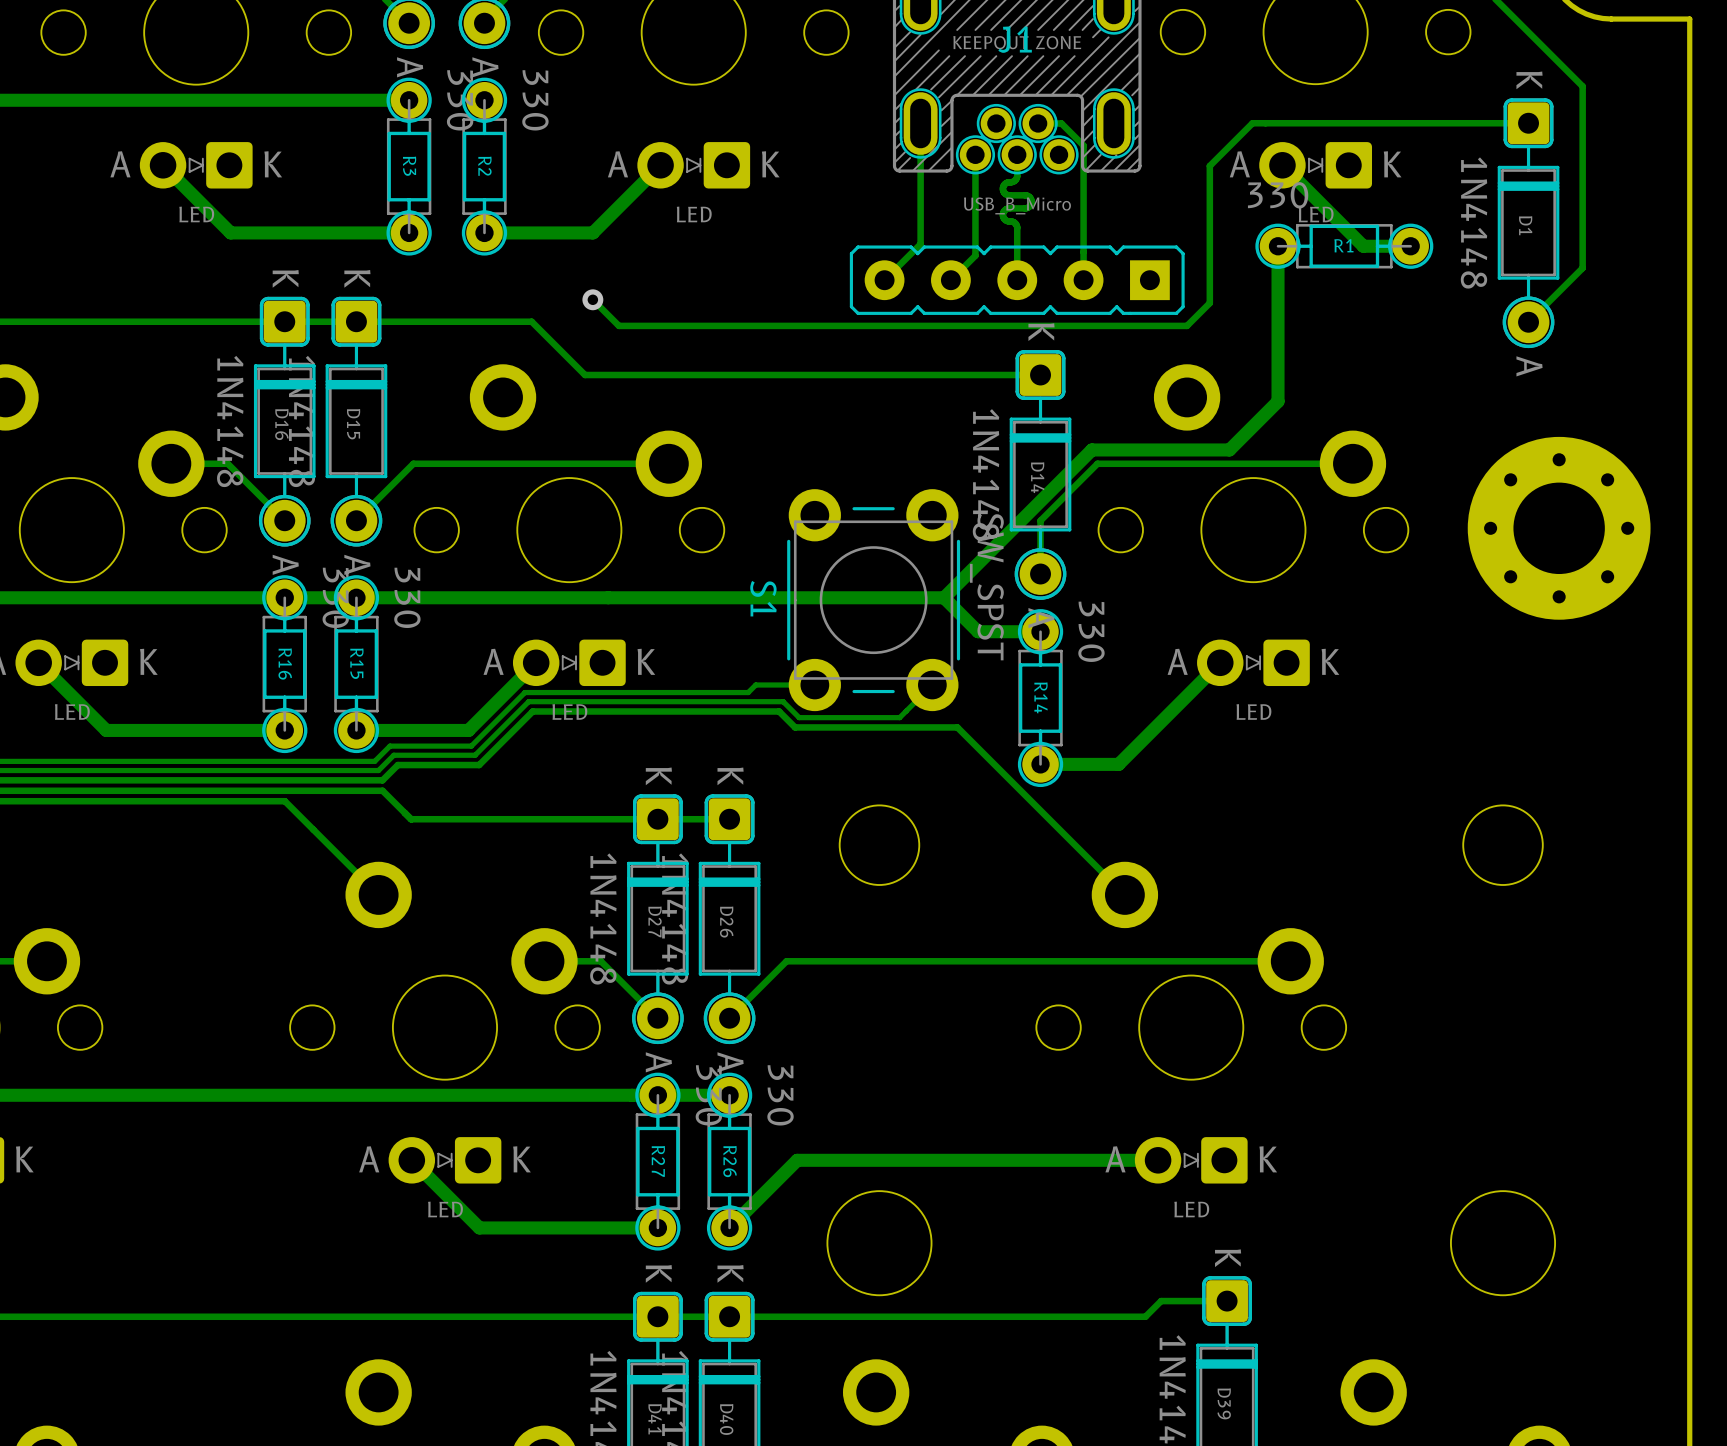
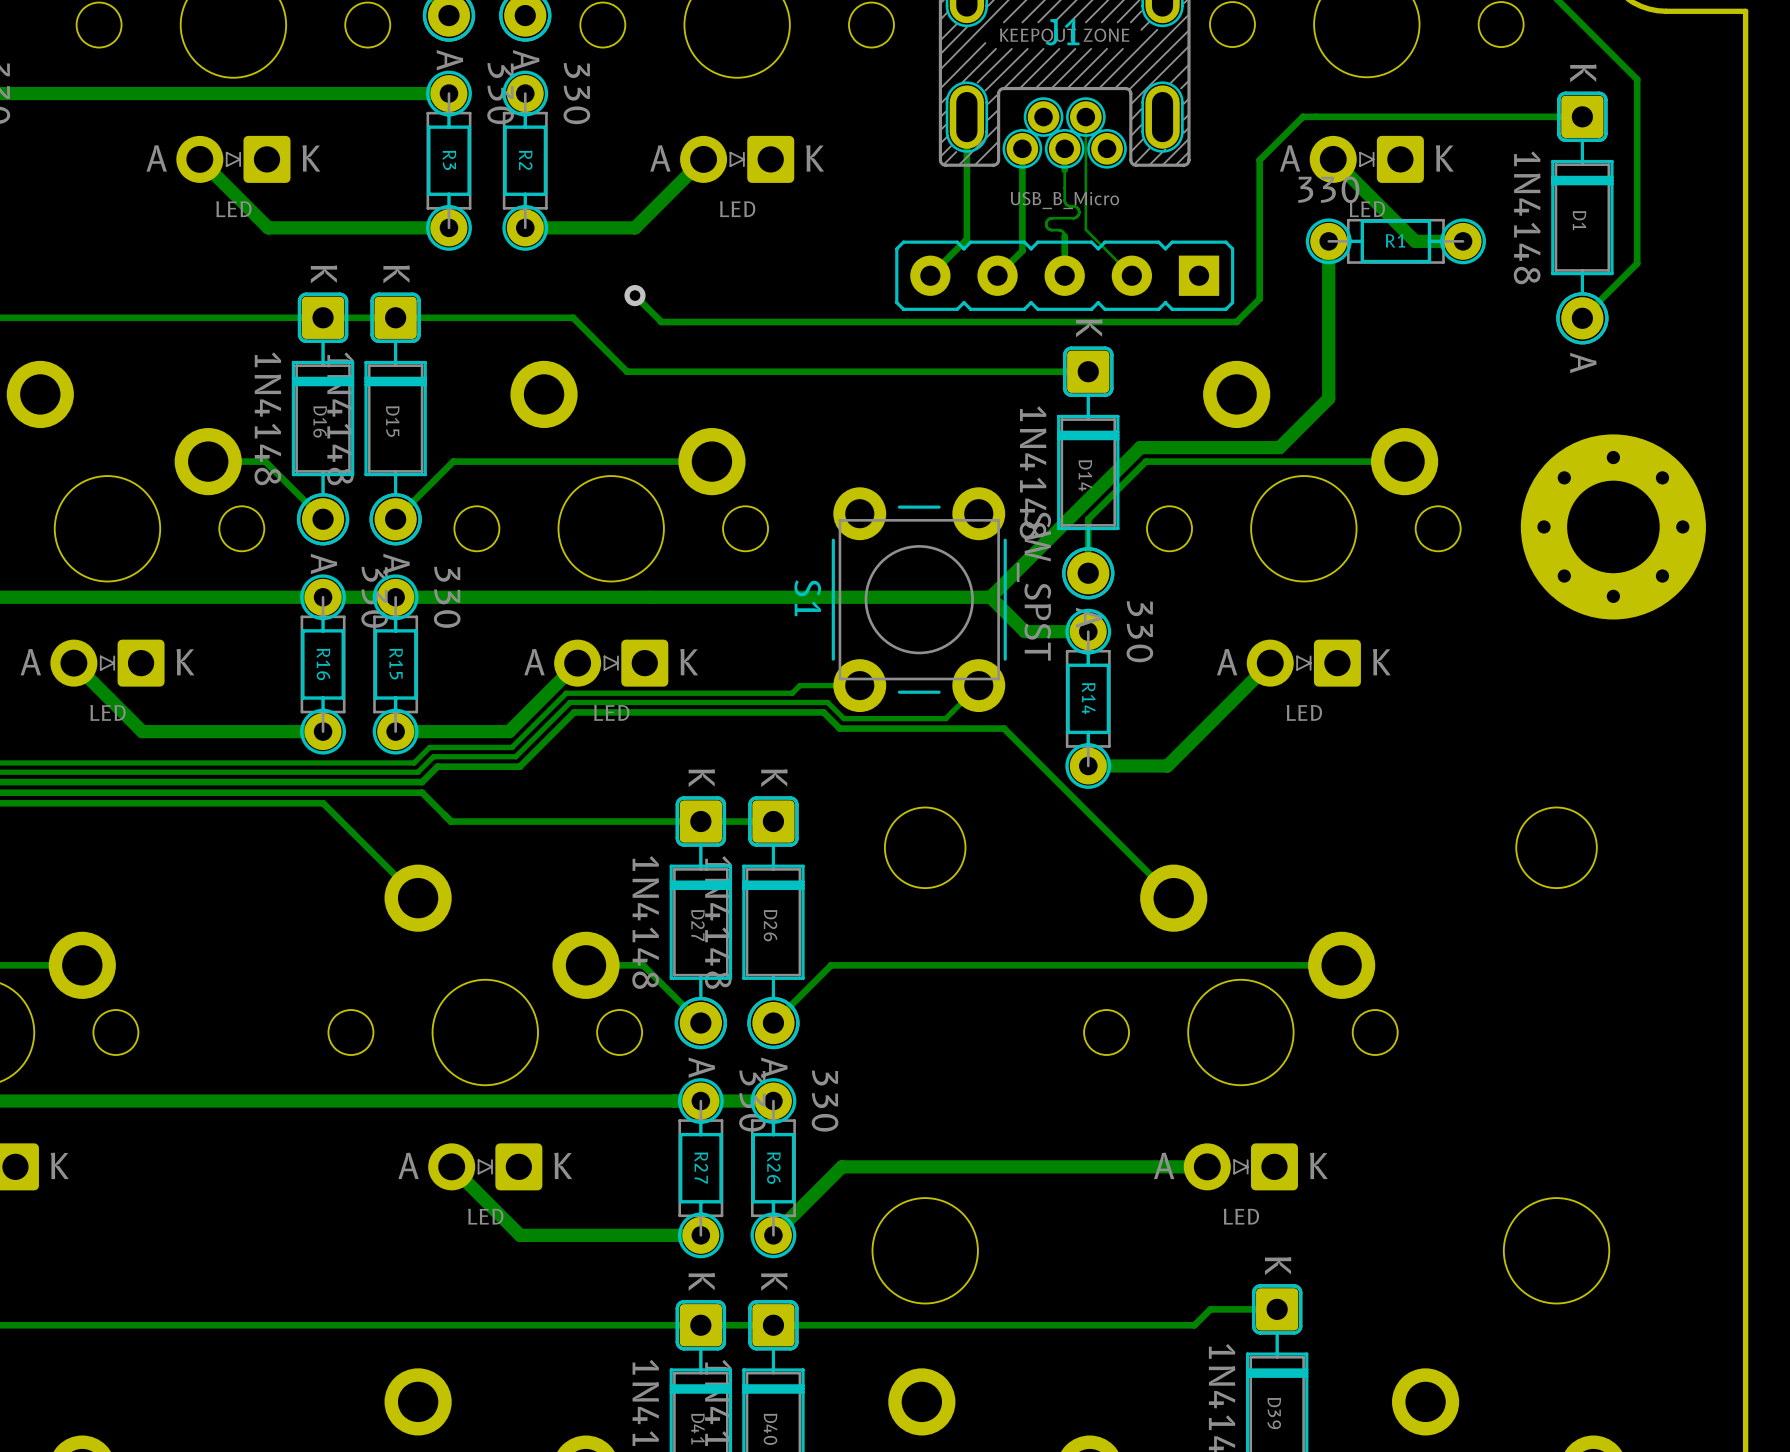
track: (1038, 123) (1061, 123) (1083, 145) (1083, 280) -> (1085, 117) (1085, 229) (1131, 275)
track: (1017, 175) (1014, 180) (1005, 183) (1002, 188) (1006, 194) (1026, 195) (1031, 200) (1027, 207) (1007, 208) (1003, 213) (1005, 220) (1013, 222) (1016, 225) (1017, 241) -> (1064, 169) (1064, 201) (1068, 205) (1077, 207) (1079, 213) (1074, 218) (1050, 218) (1046, 224) (1049, 229) (1062, 231) (1064, 236)

